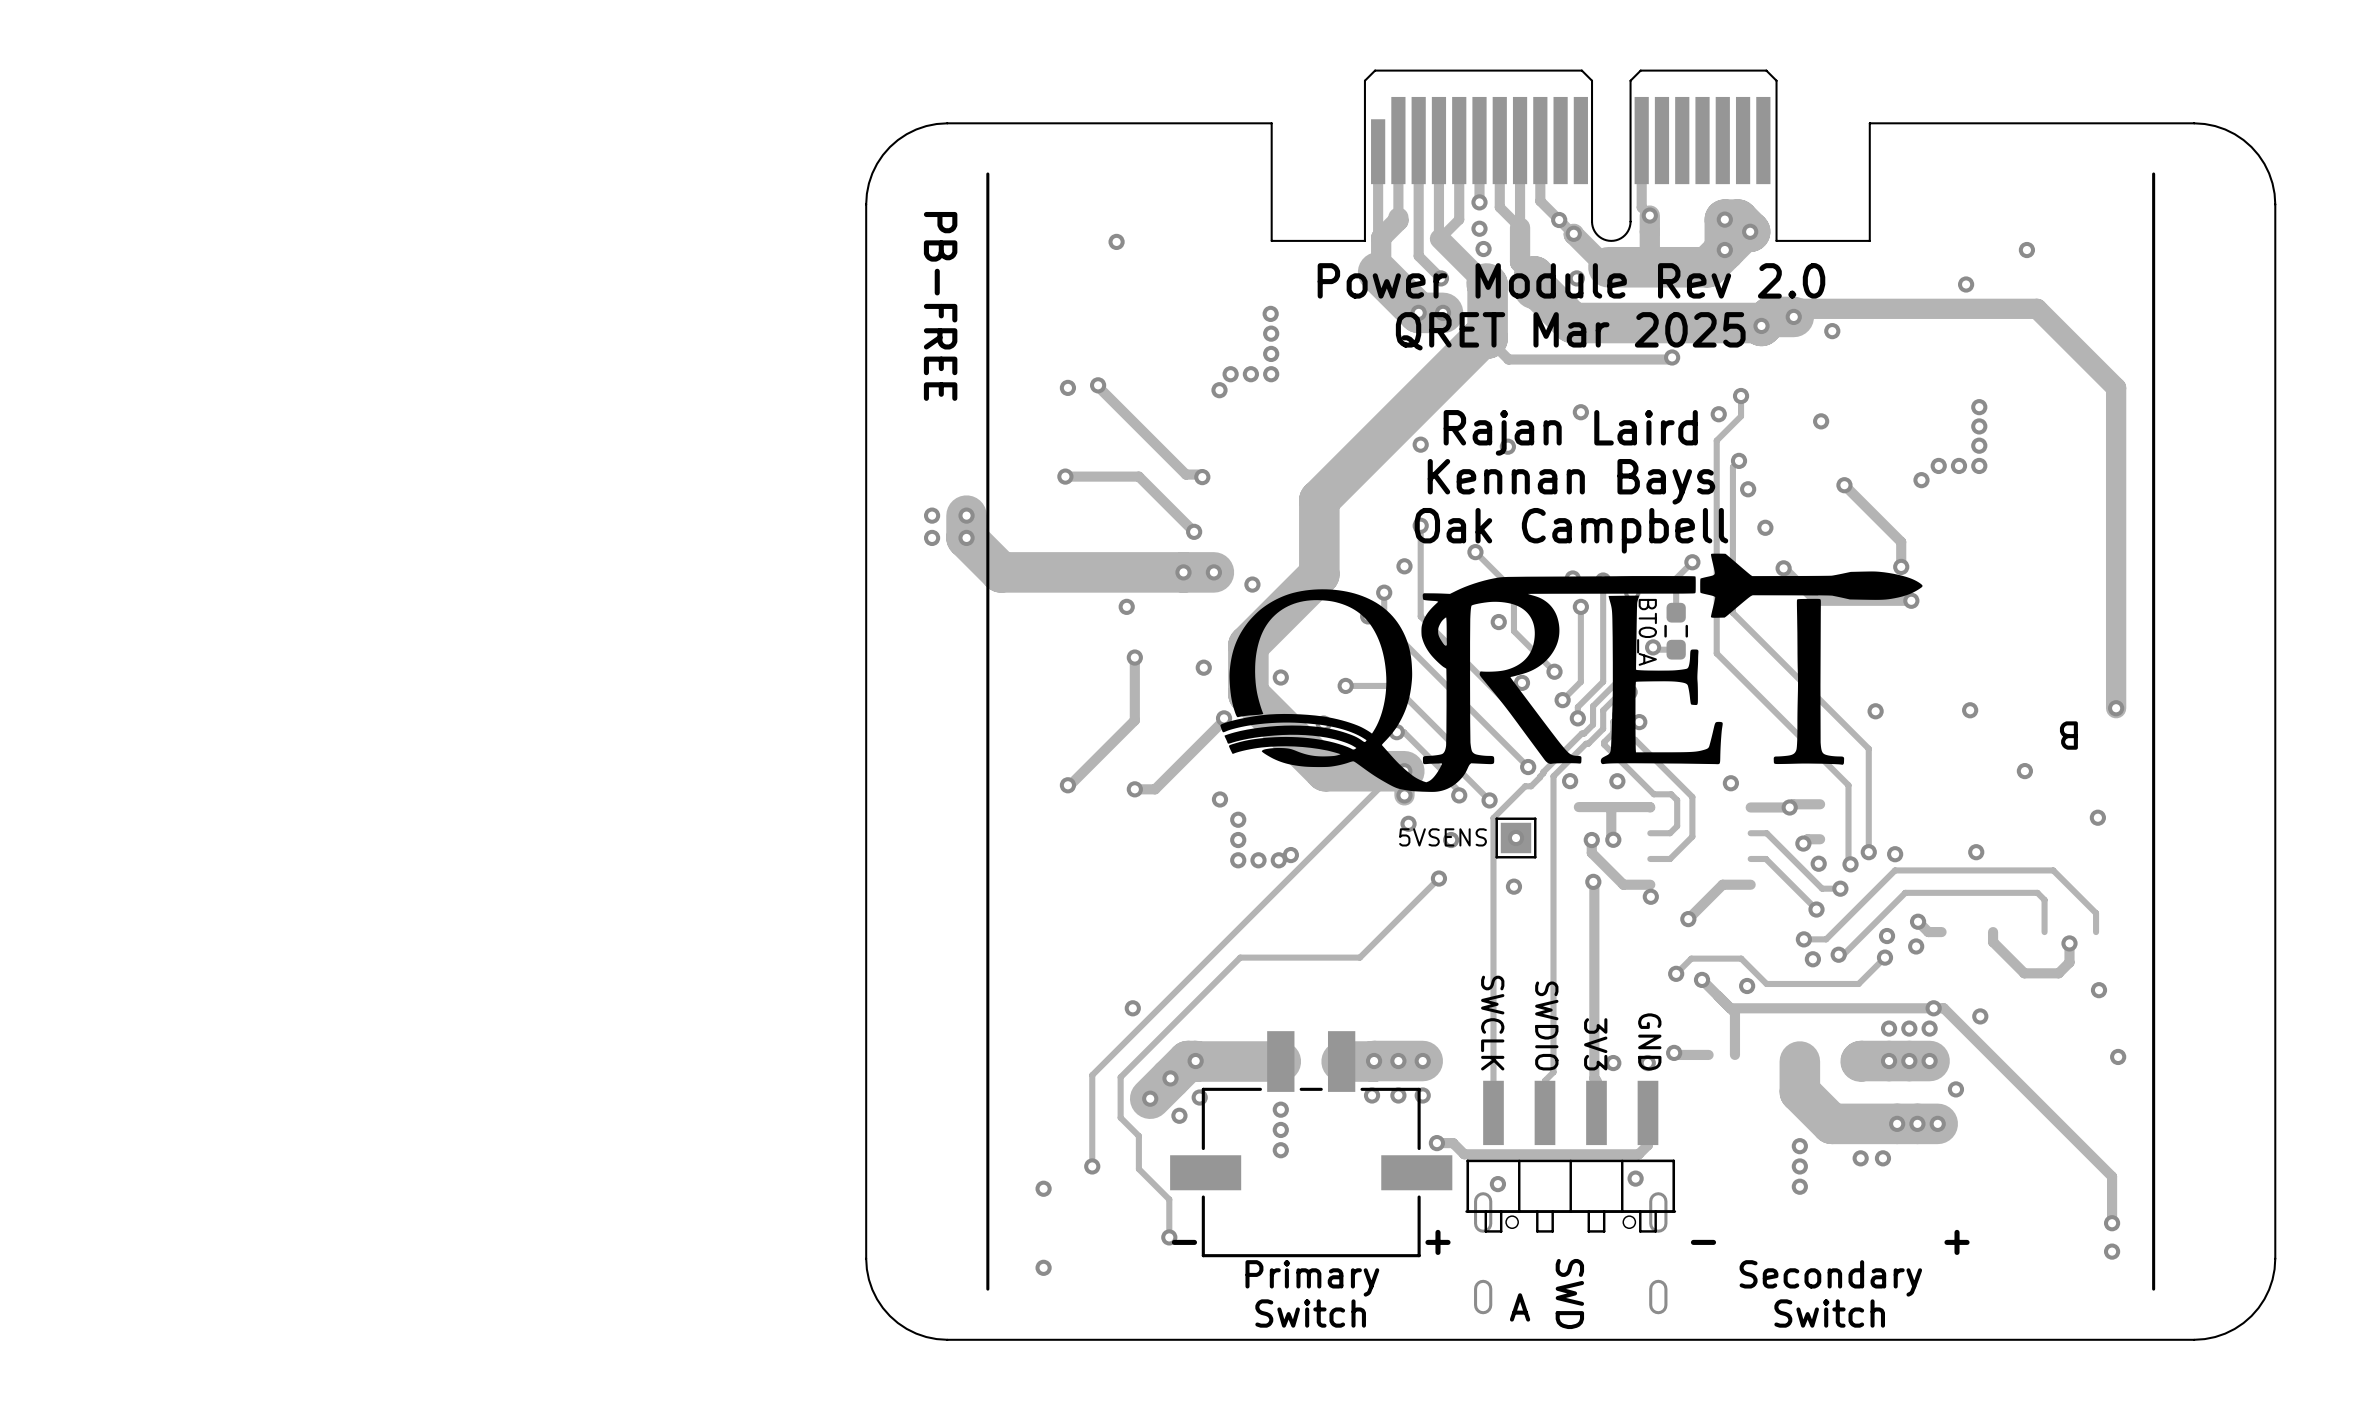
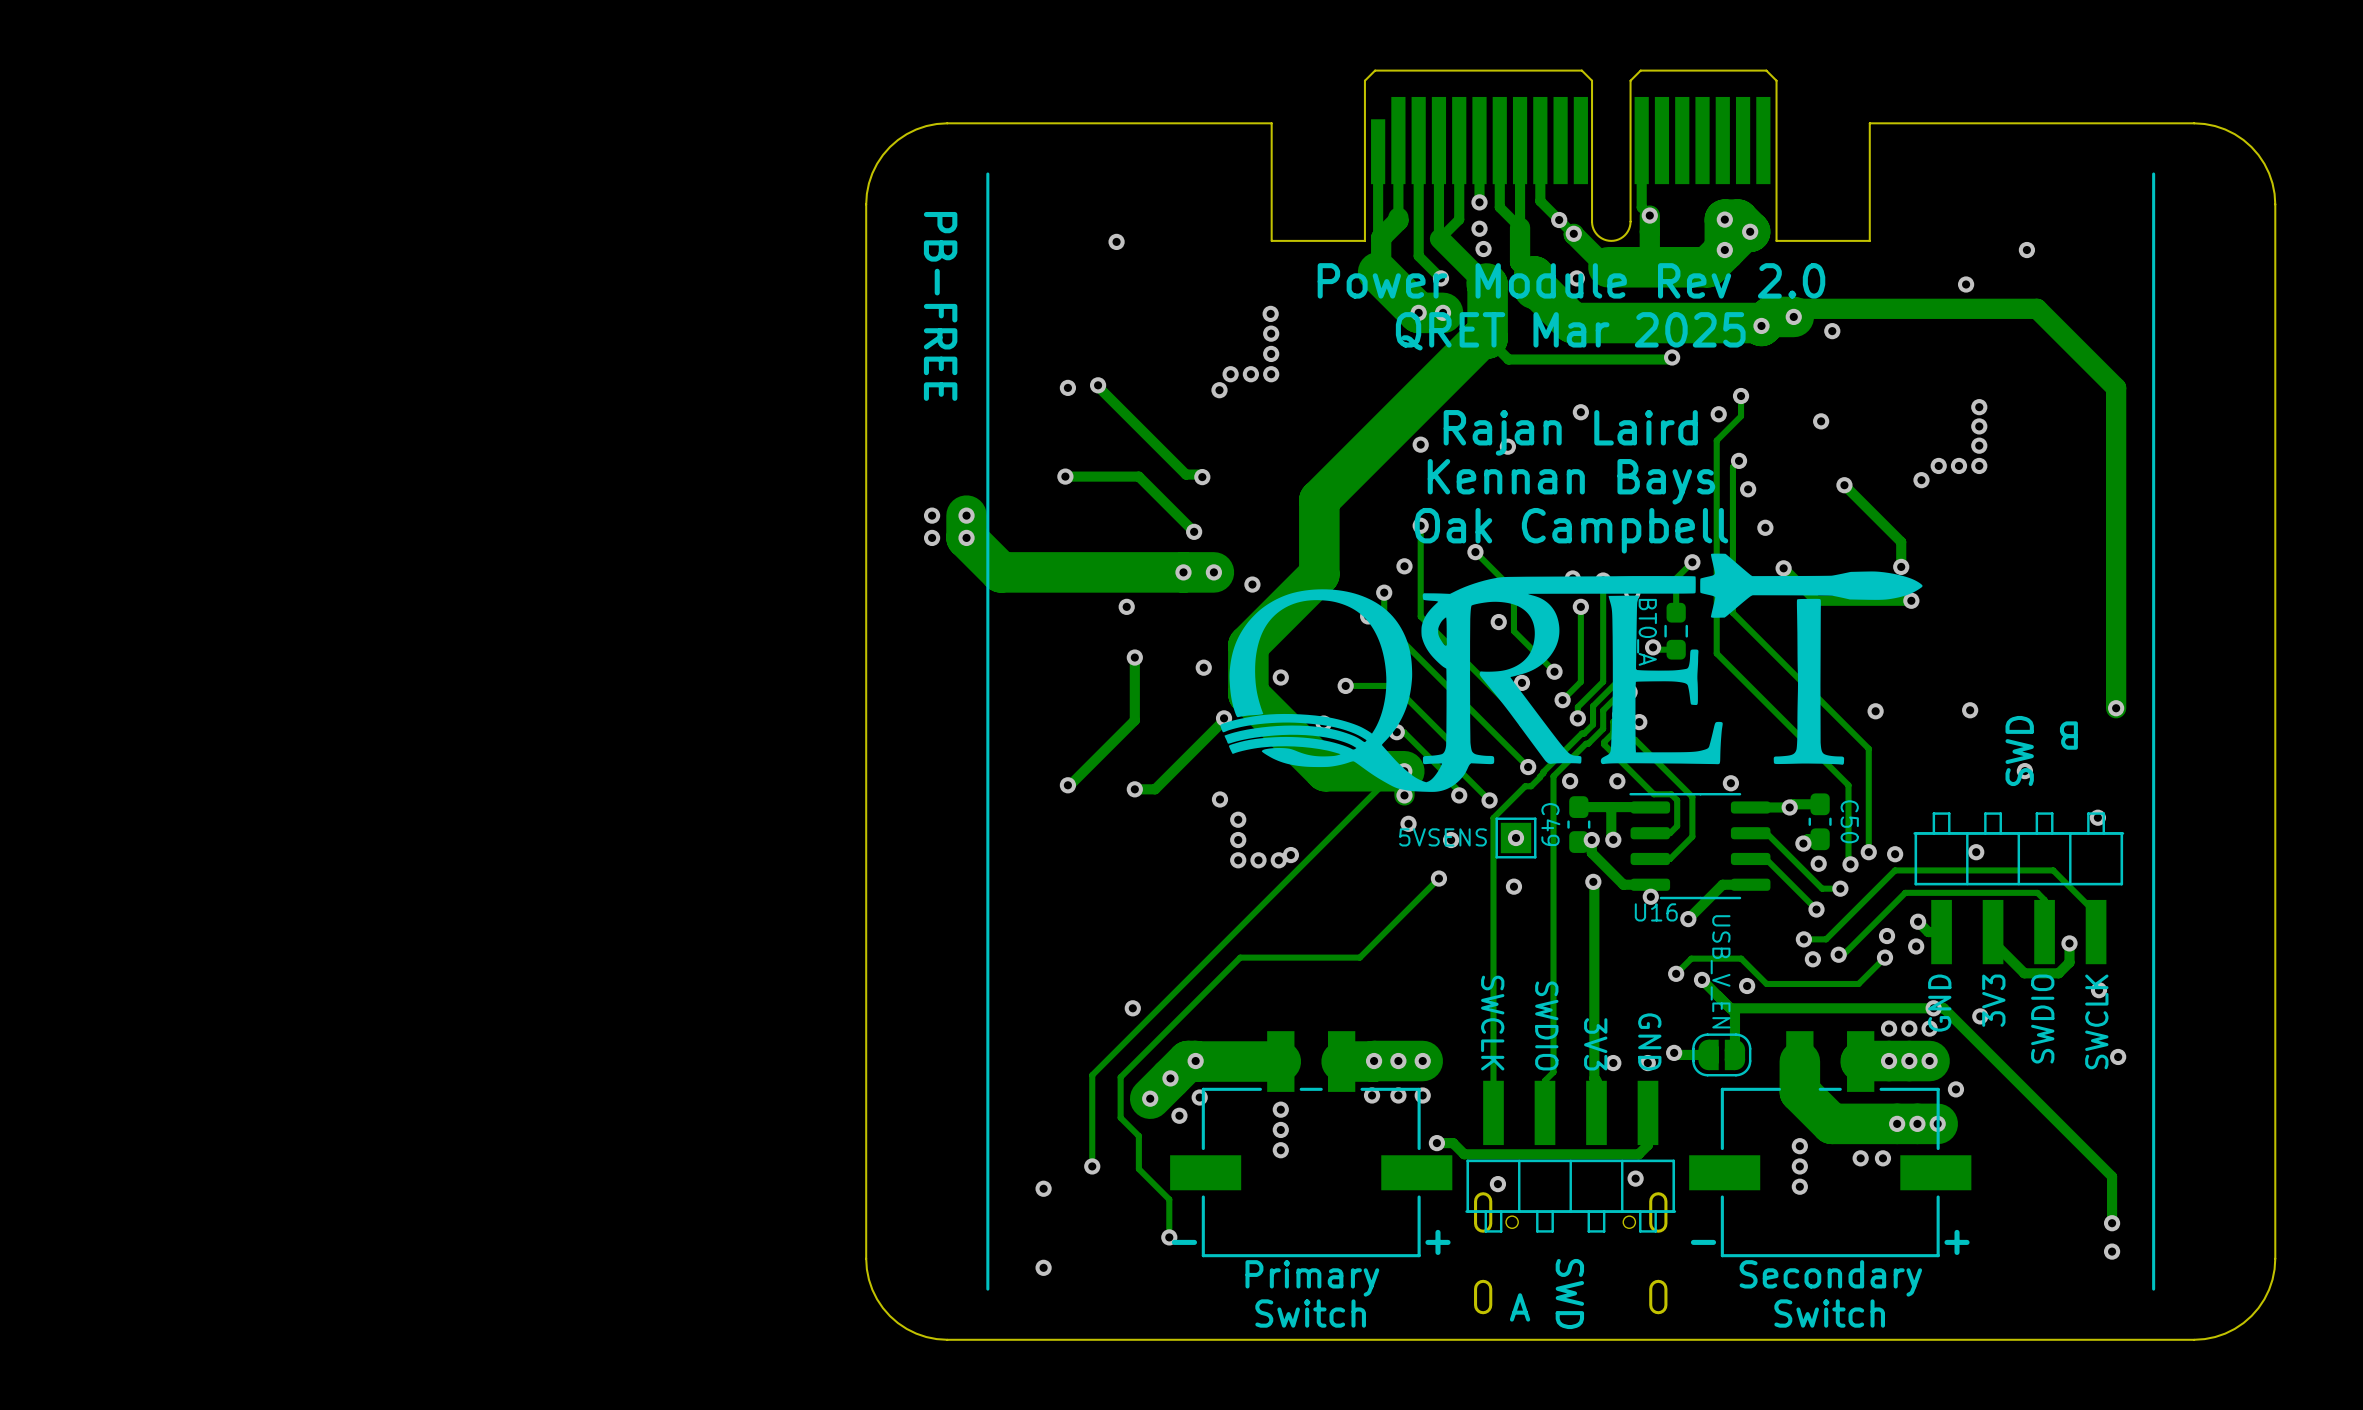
C50: none -> (1820, 821)
C49: none -> (1578, 824)
U16: none -> (1699, 846)
part: none -> (2018, 888)
part: none -> USB_V_EN (1721, 1054)
part: none -> (1830, 1144)

